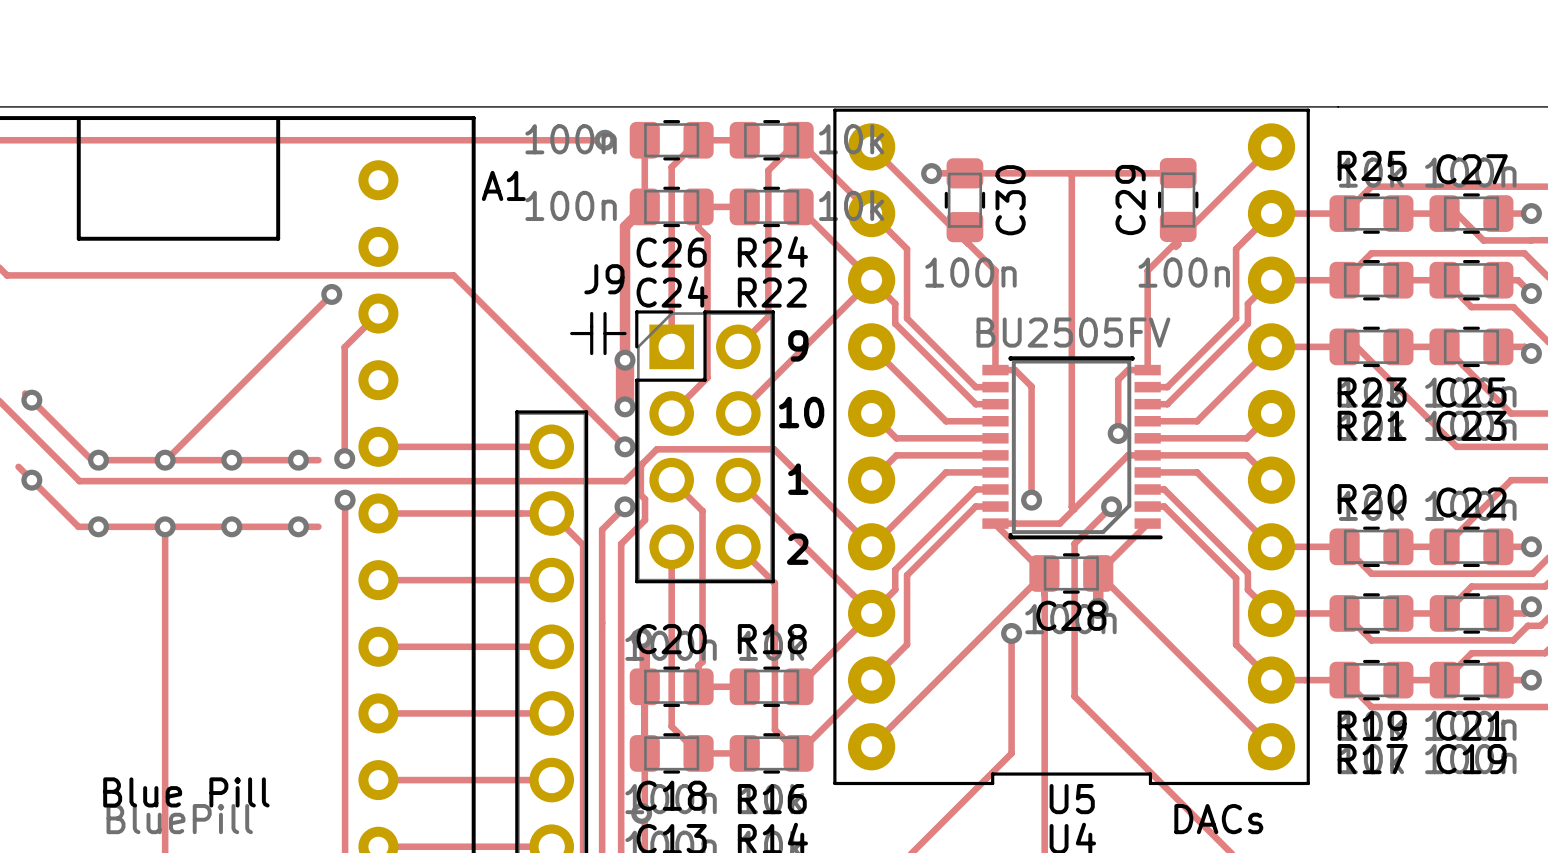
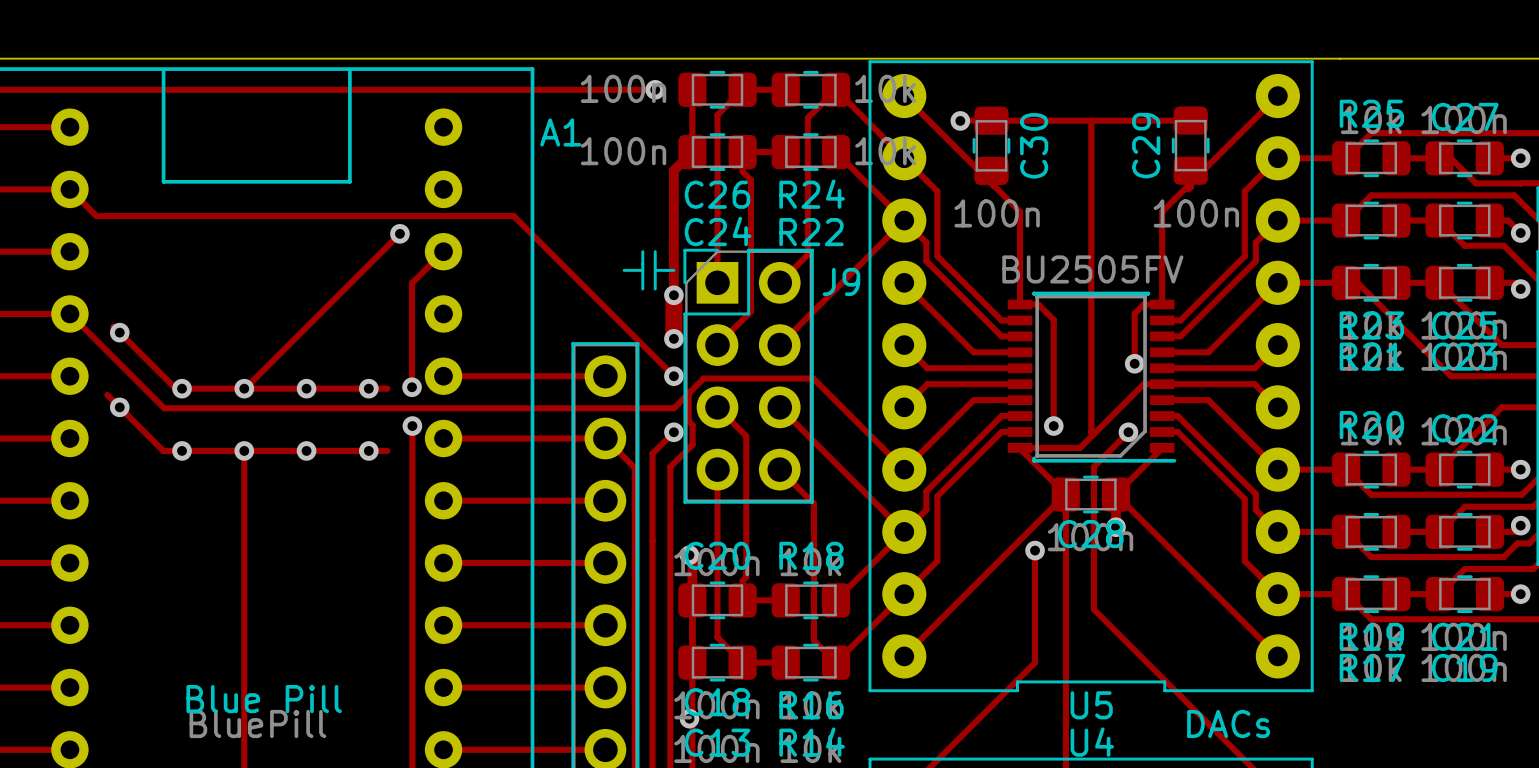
J9 name position: J9 (604, 279) -> J9 (841, 281)
text: 9 (798, 345) -> none
text: 10 (801, 412) -> none
text: 1 (798, 479) -> none
text: 2 (797, 549) -> none

